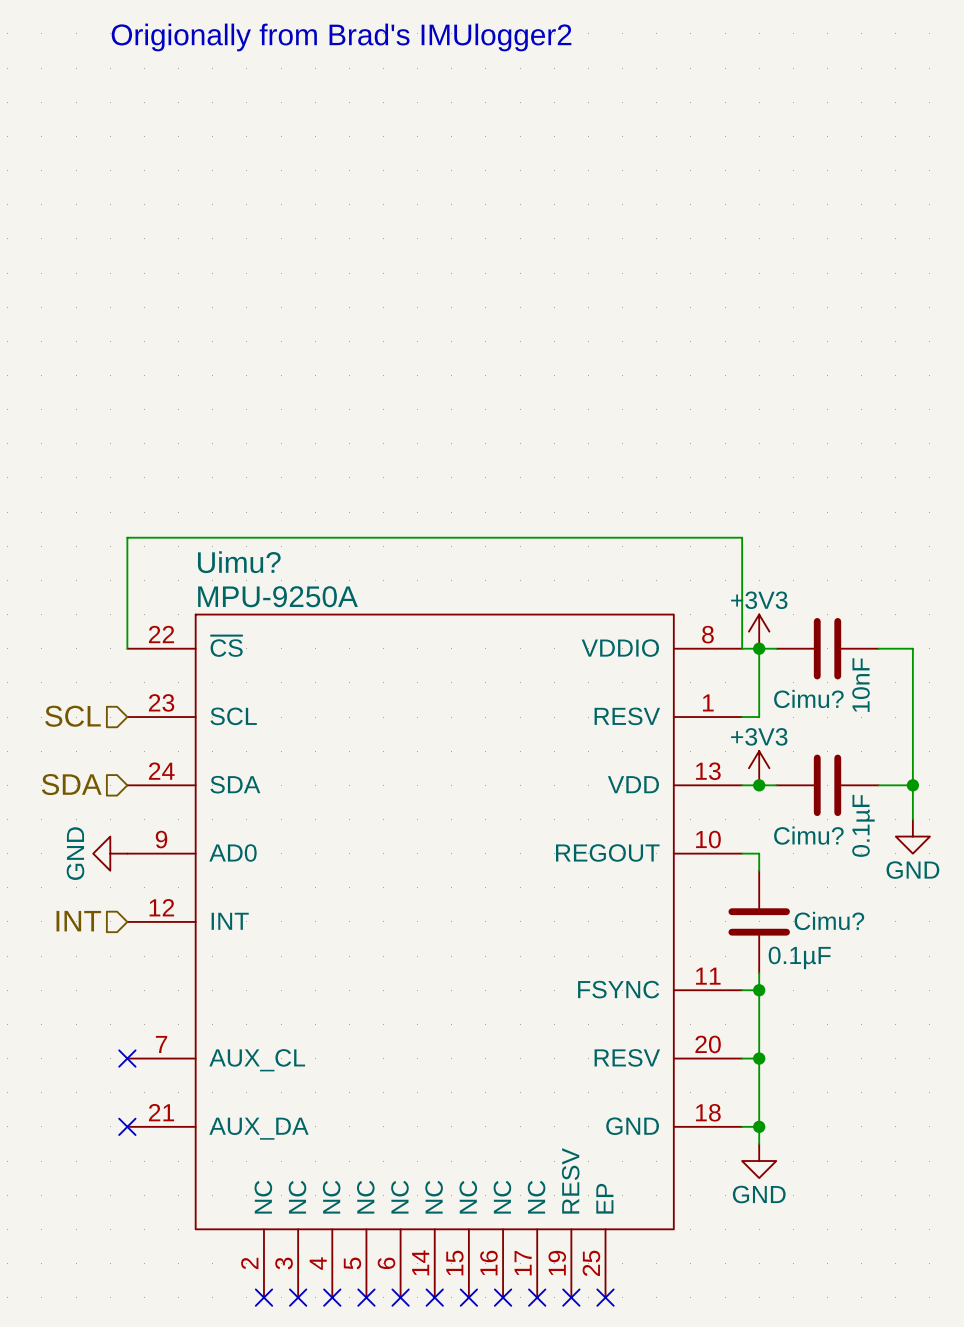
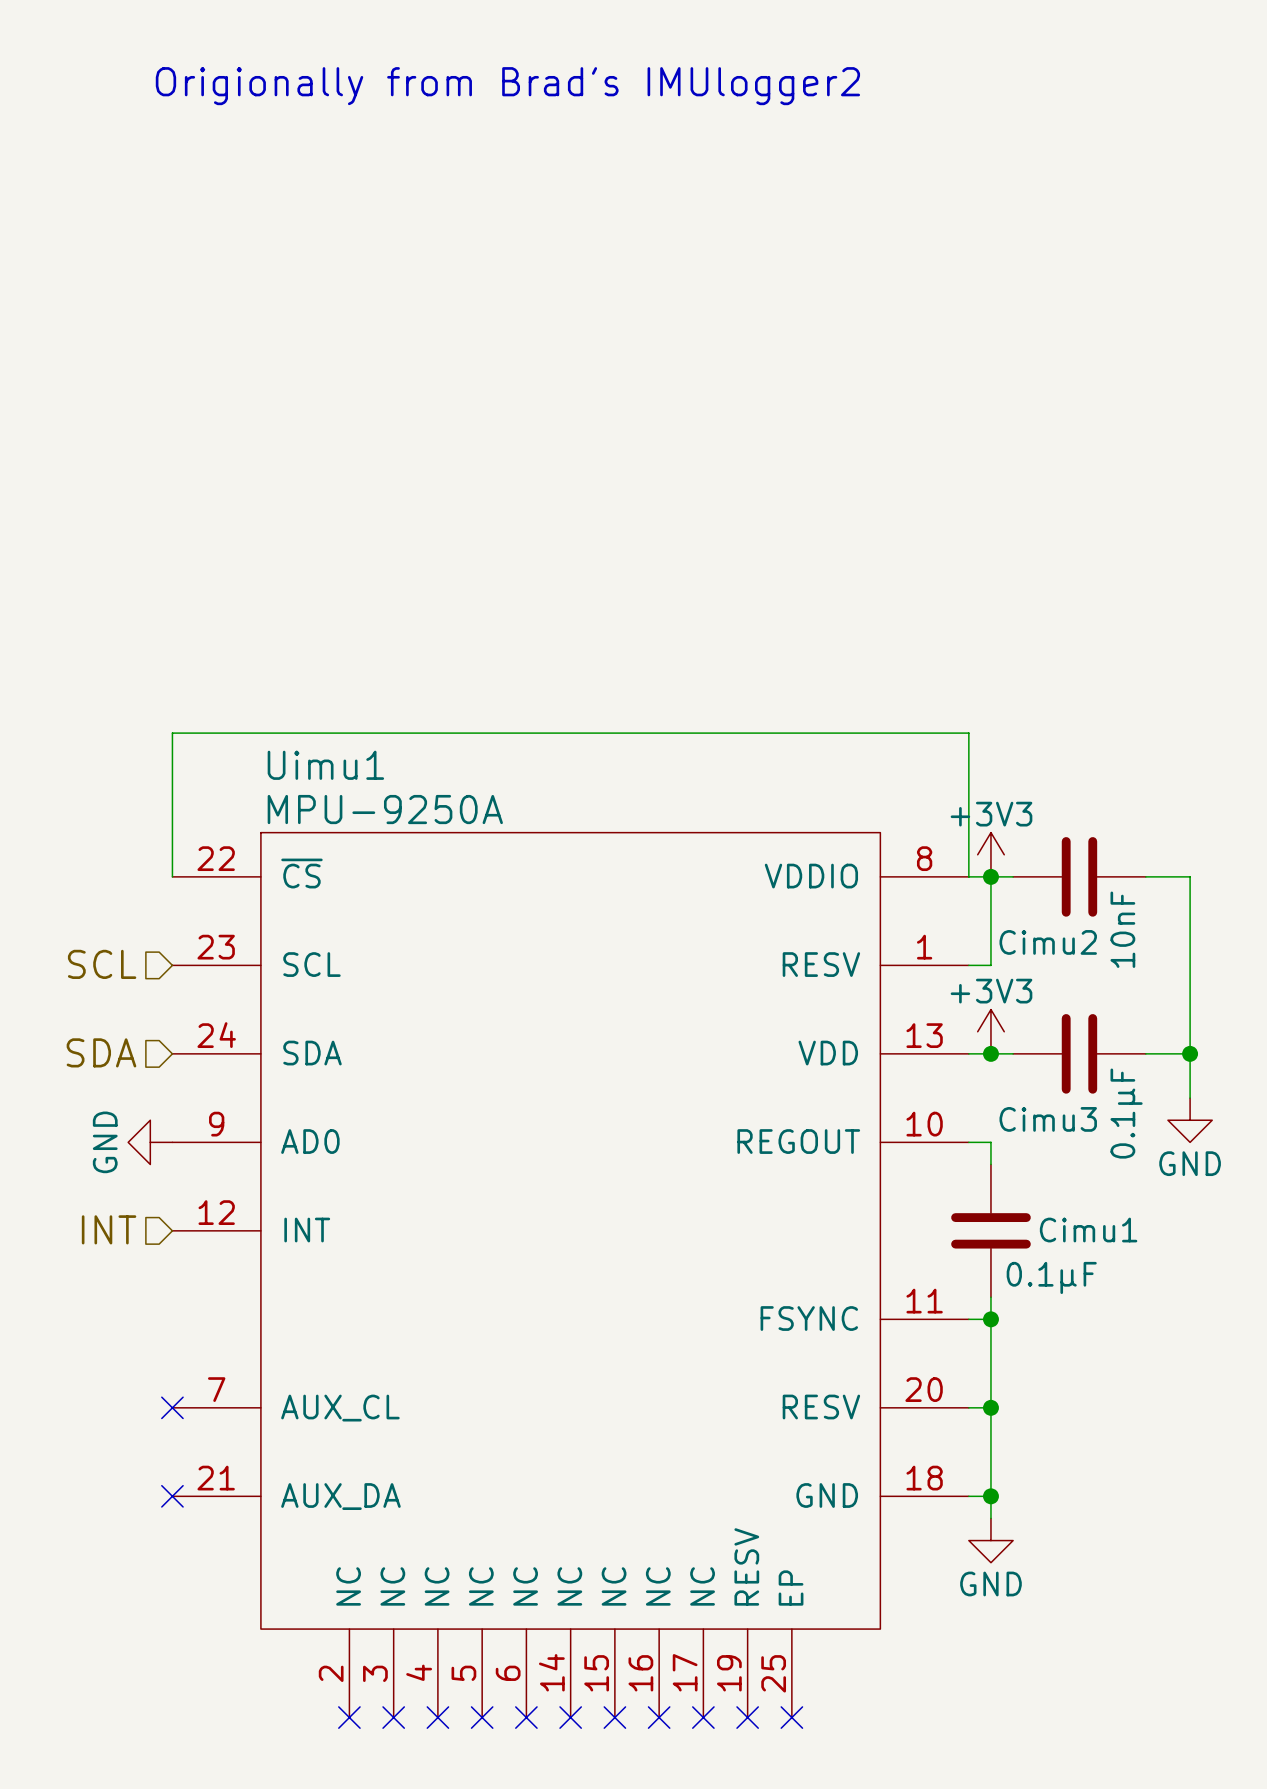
Uimu? name: Uimu? (239, 562) -> Uimu1 (325, 765)
Cimu? name: Cimu? (808, 698) -> Cimu2 (1048, 942)
Cimu? name: Cimu? (808, 835) -> Cimu3 (1048, 1119)
Cimu? name: Cimu? (829, 920) -> Cimu1 (1088, 1230)

